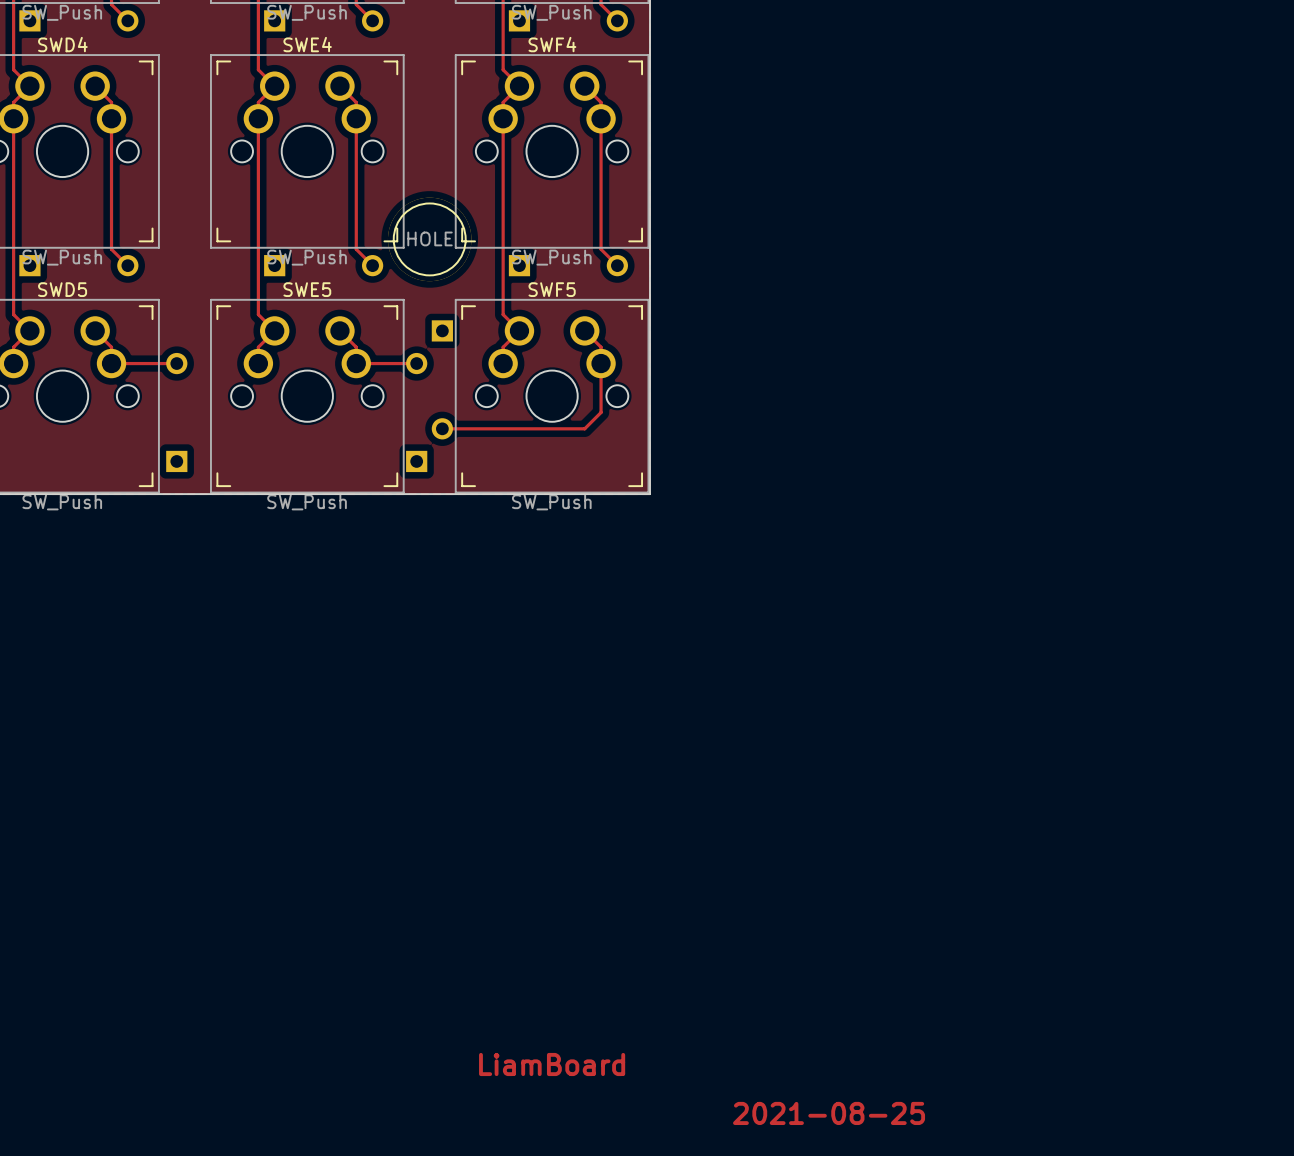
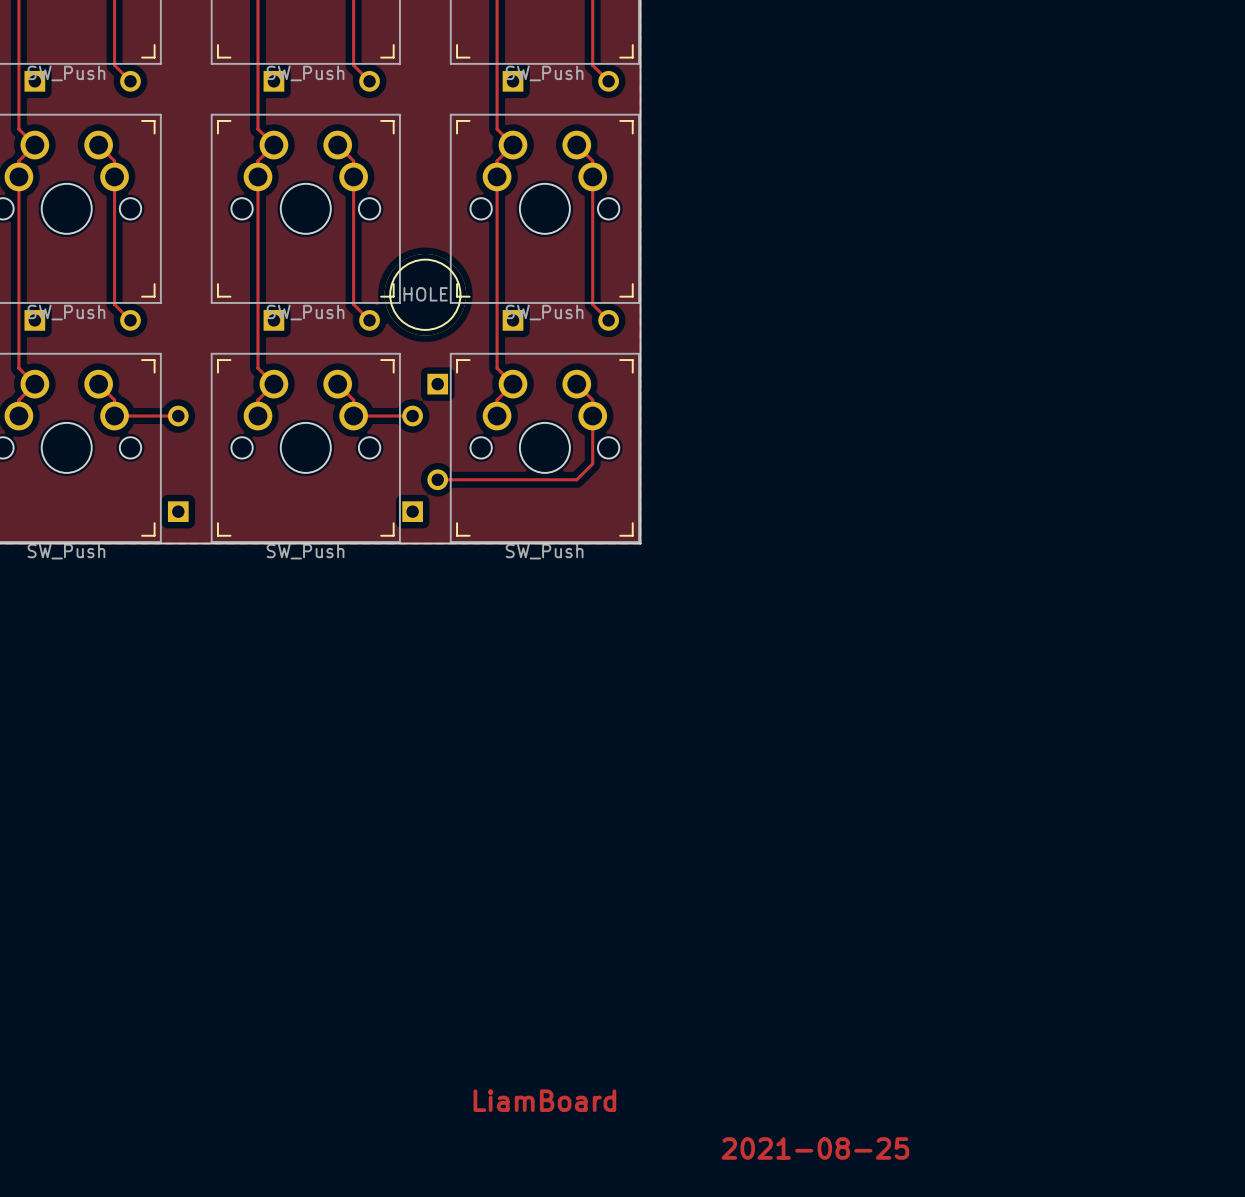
SWD4 name: SWD4 (62, 44) -> none
SWE4 name: SWE4 (307, 44) -> none
SWF4 name: SWF4 (552, 44) -> none
SWD5 name: SWD5 (62, 289) -> none
SWE5 name: SWE5 (307, 289) -> none
SWF5 name: SWF5 (552, 289) -> none

